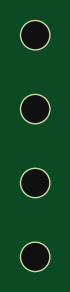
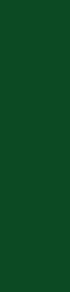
part: (35, 35) -> none
part: (35, 109) -> none
part: (35, 182) -> none
part: (35, 256) -> none

